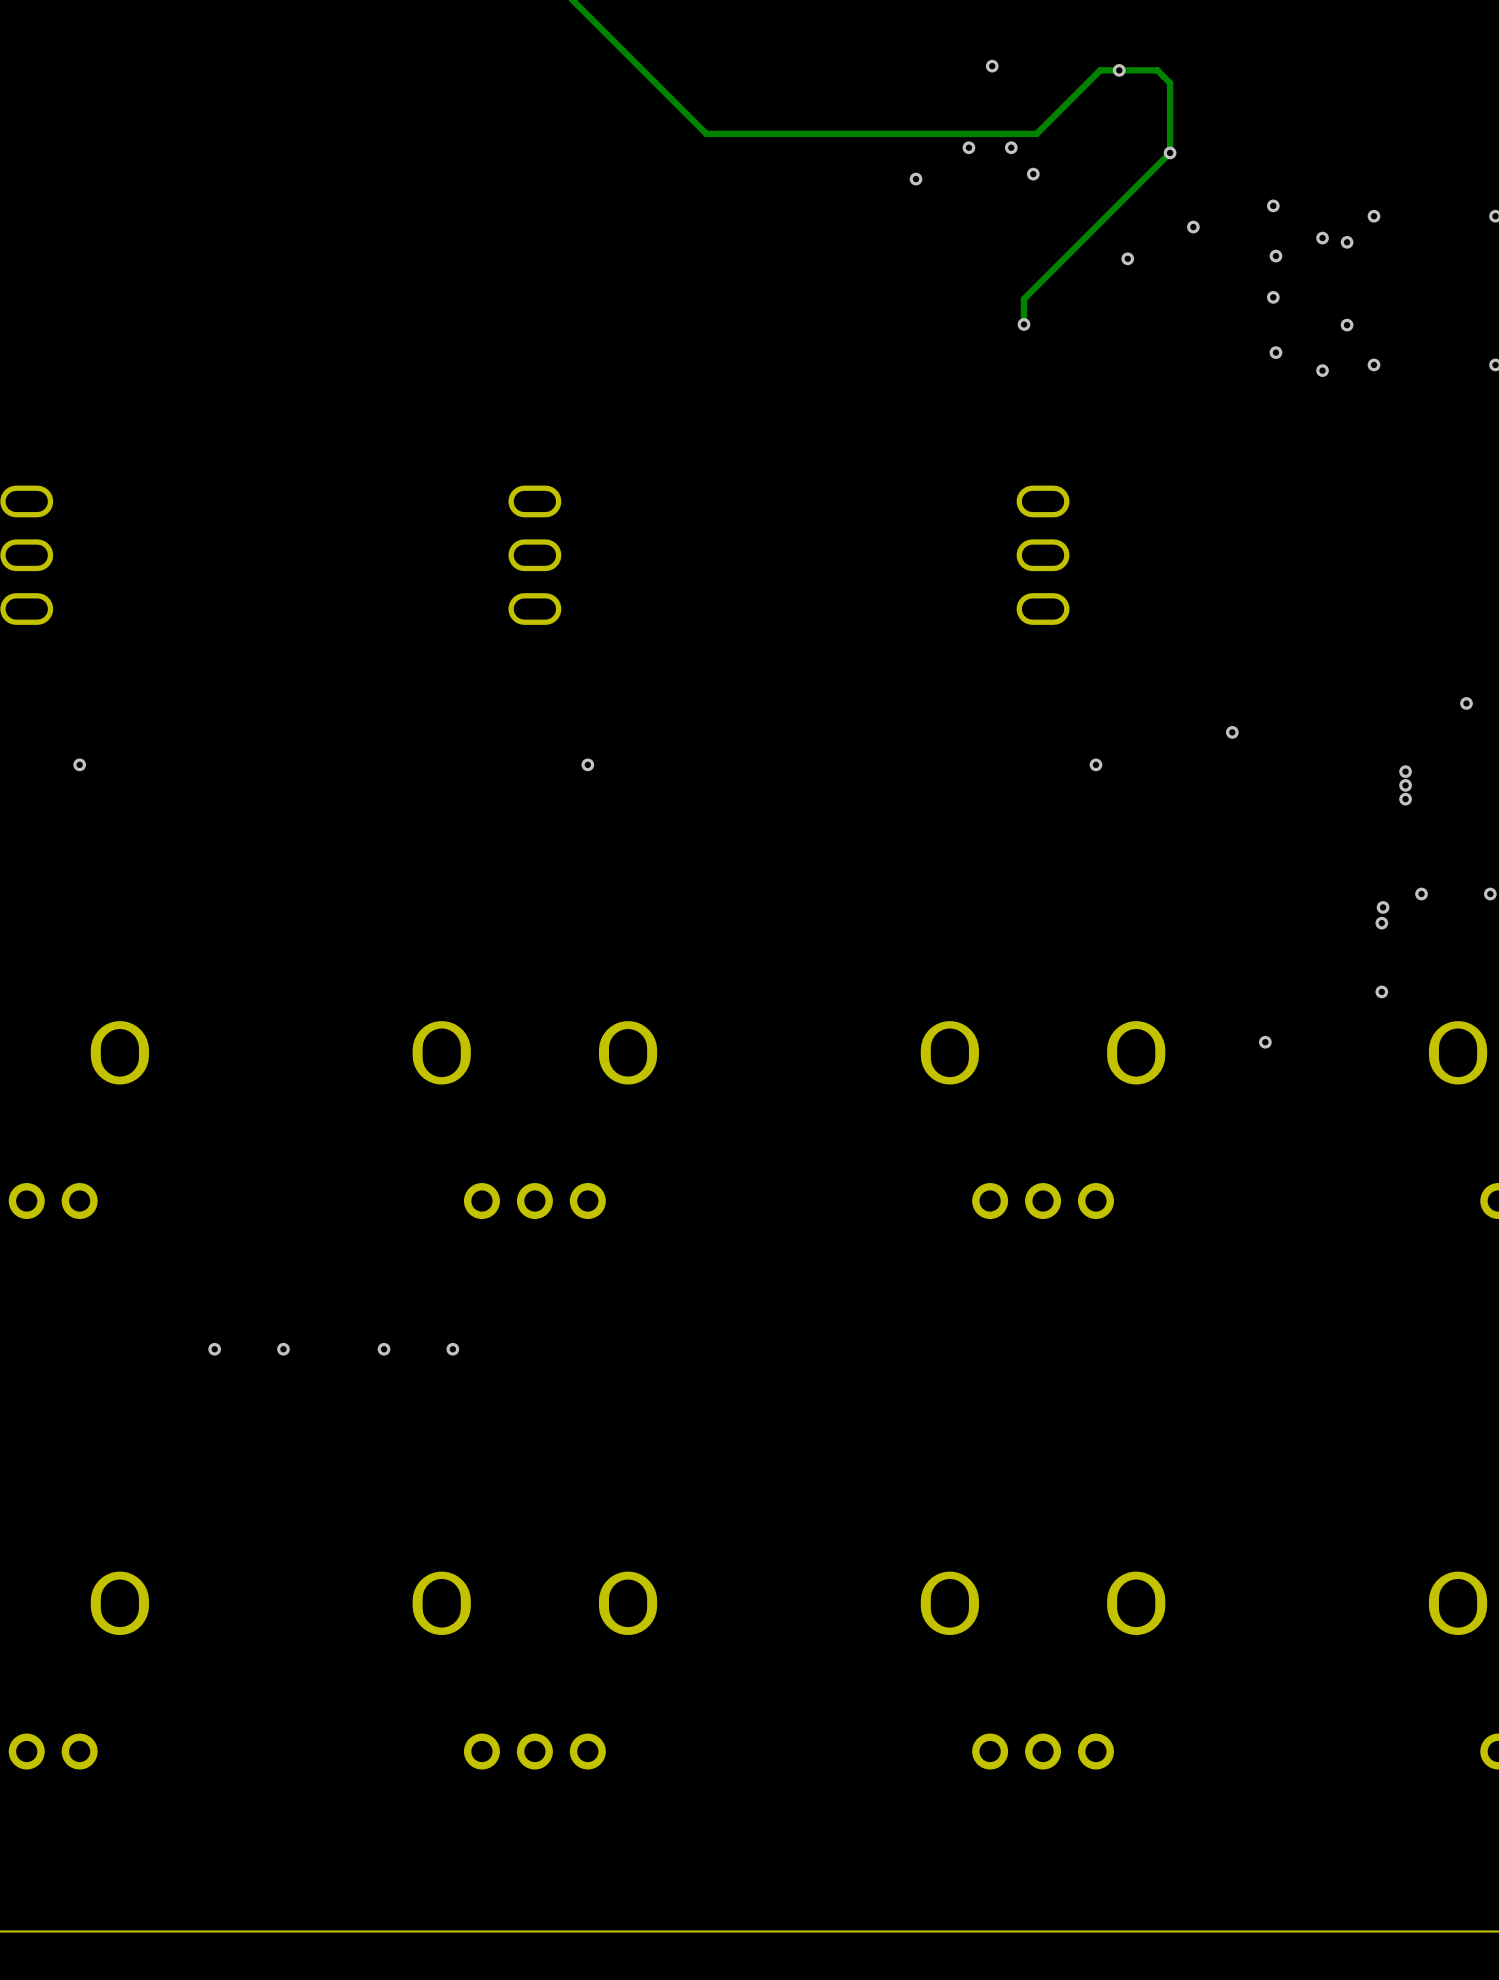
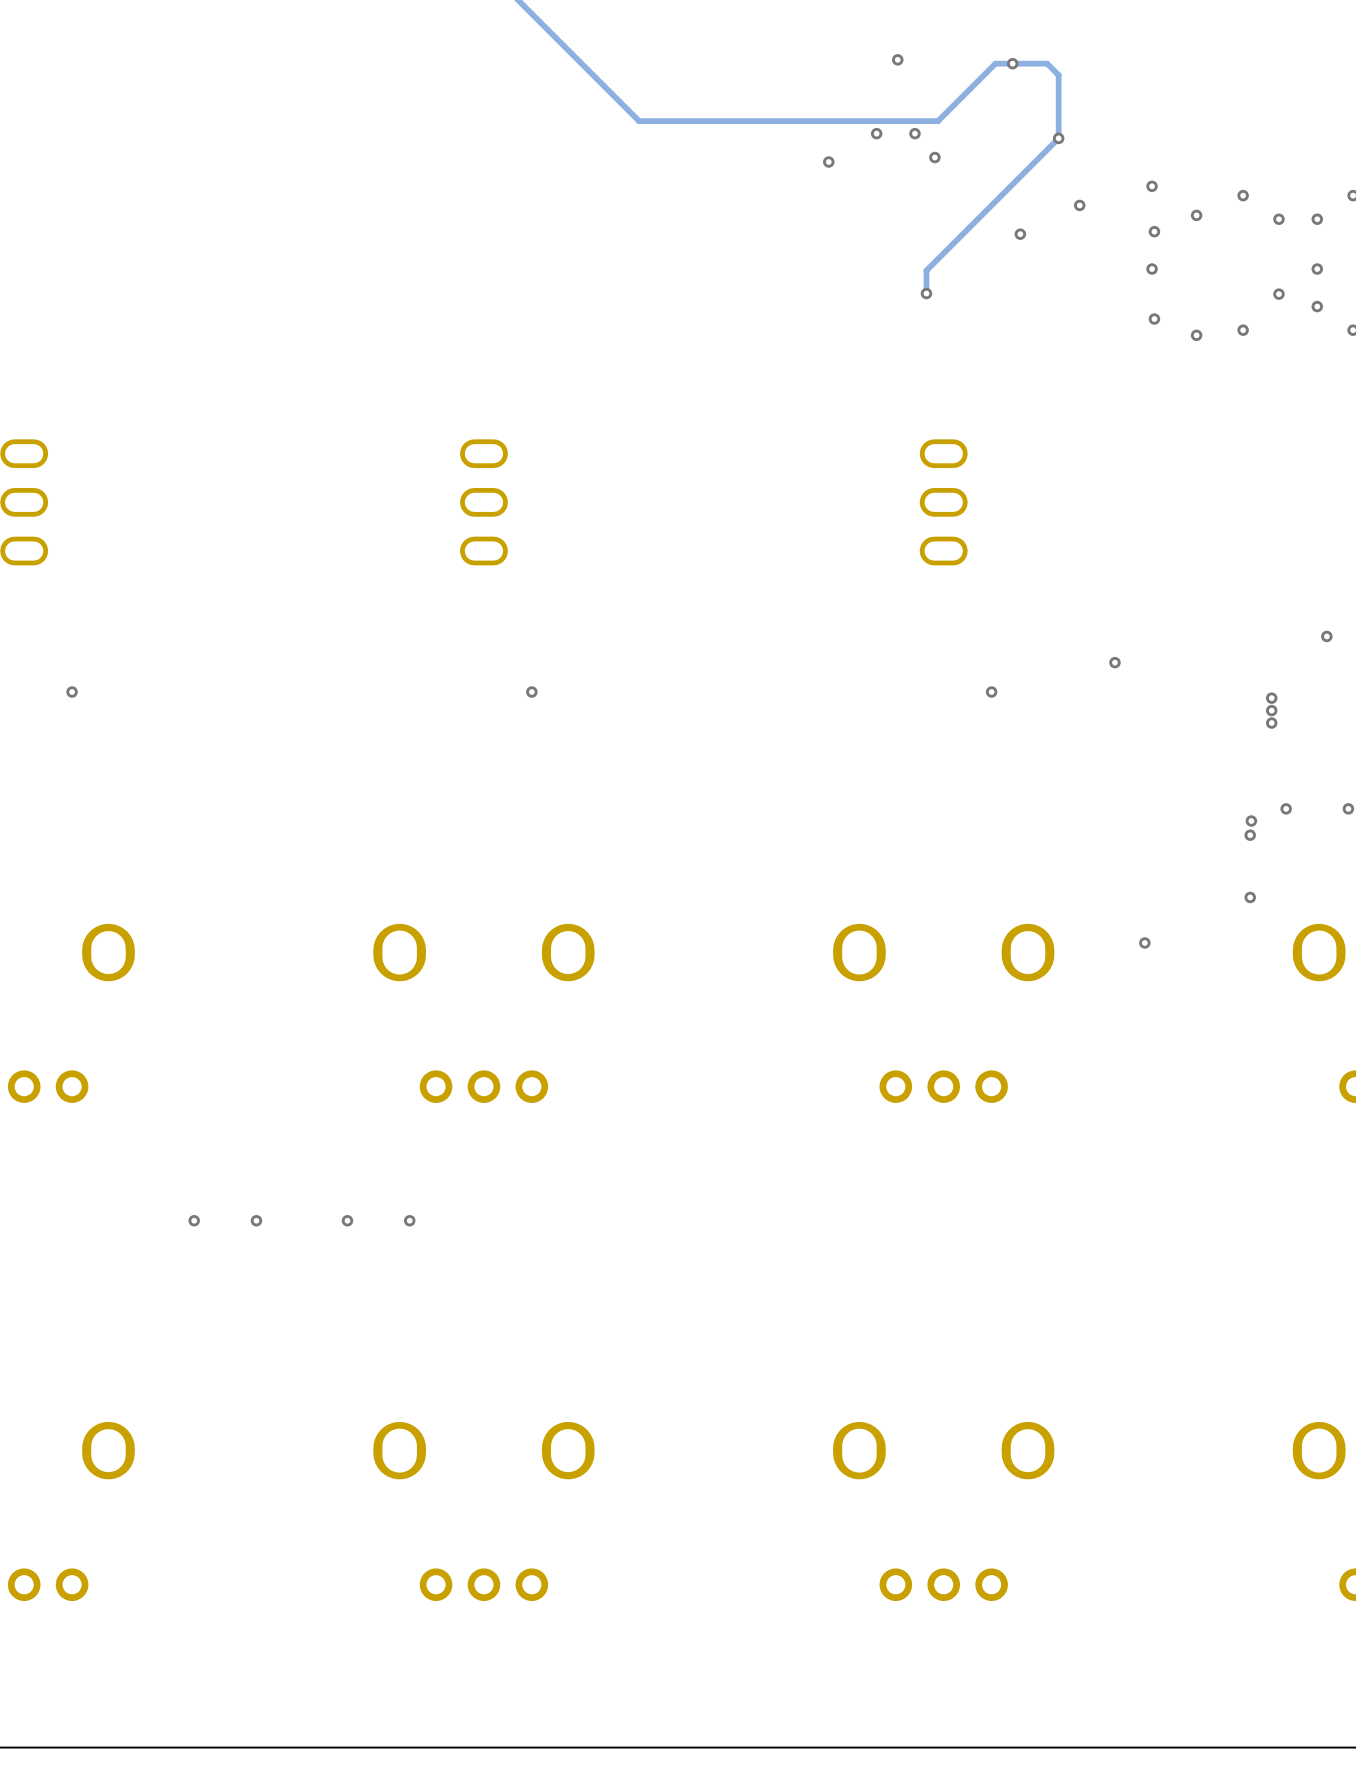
via: (1347, 242) -> none
via: none -> (1278, 219)
via: none -> (1317, 219)
via: none -> (1317, 269)
via: (1347, 325) -> none
via: none -> (1278, 294)
via: none -> (1317, 306)

